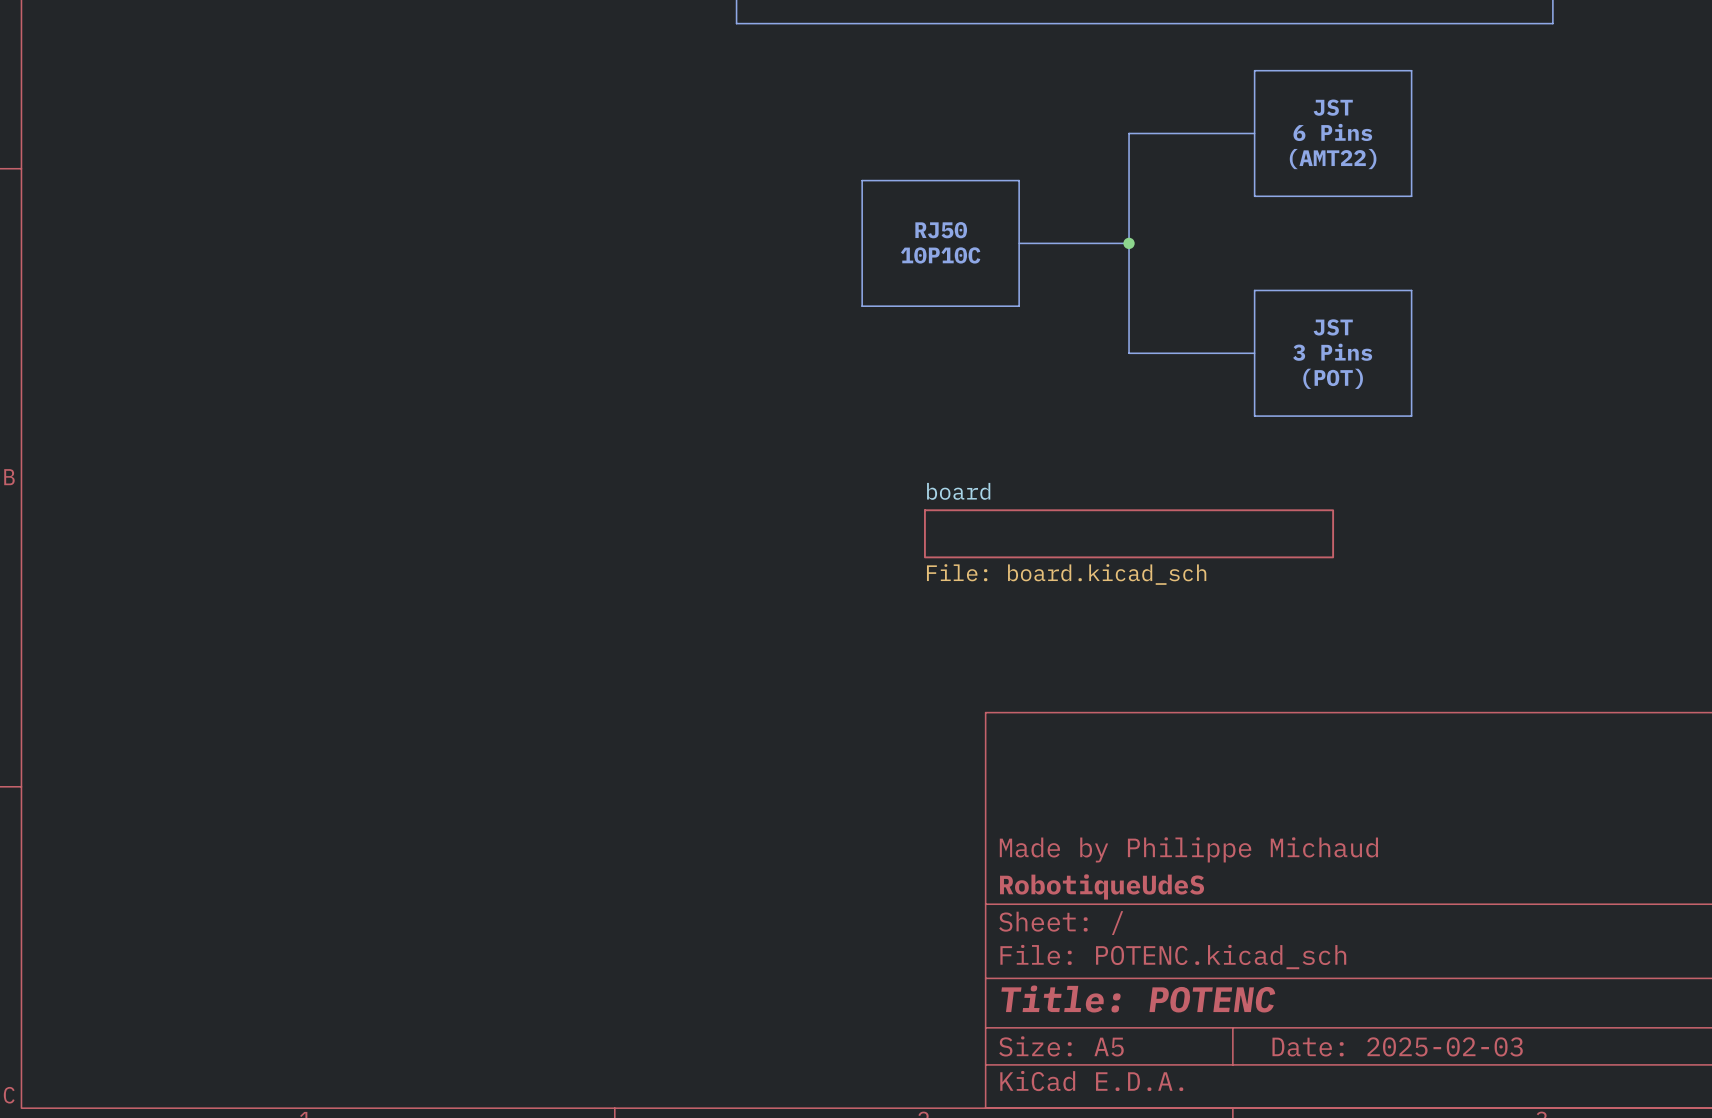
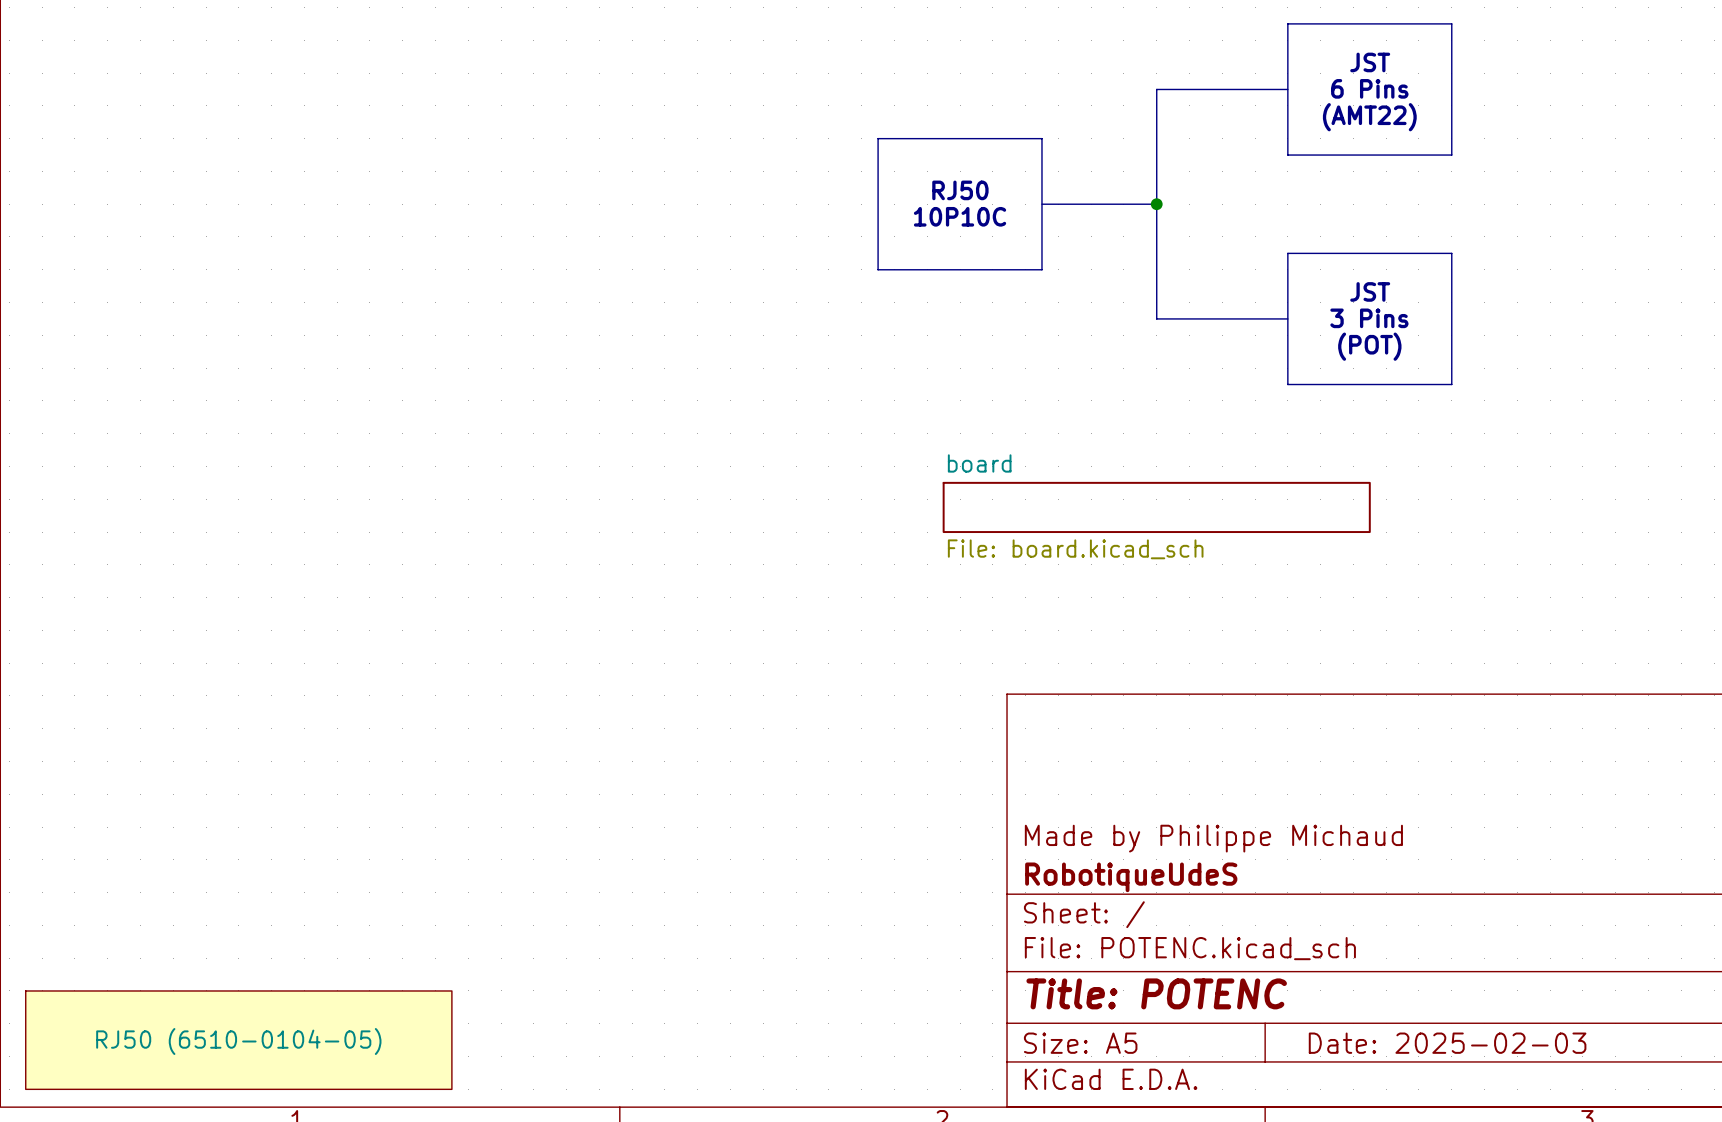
part: none -> RJ50 (6510-0104-05) (238, 1040)

